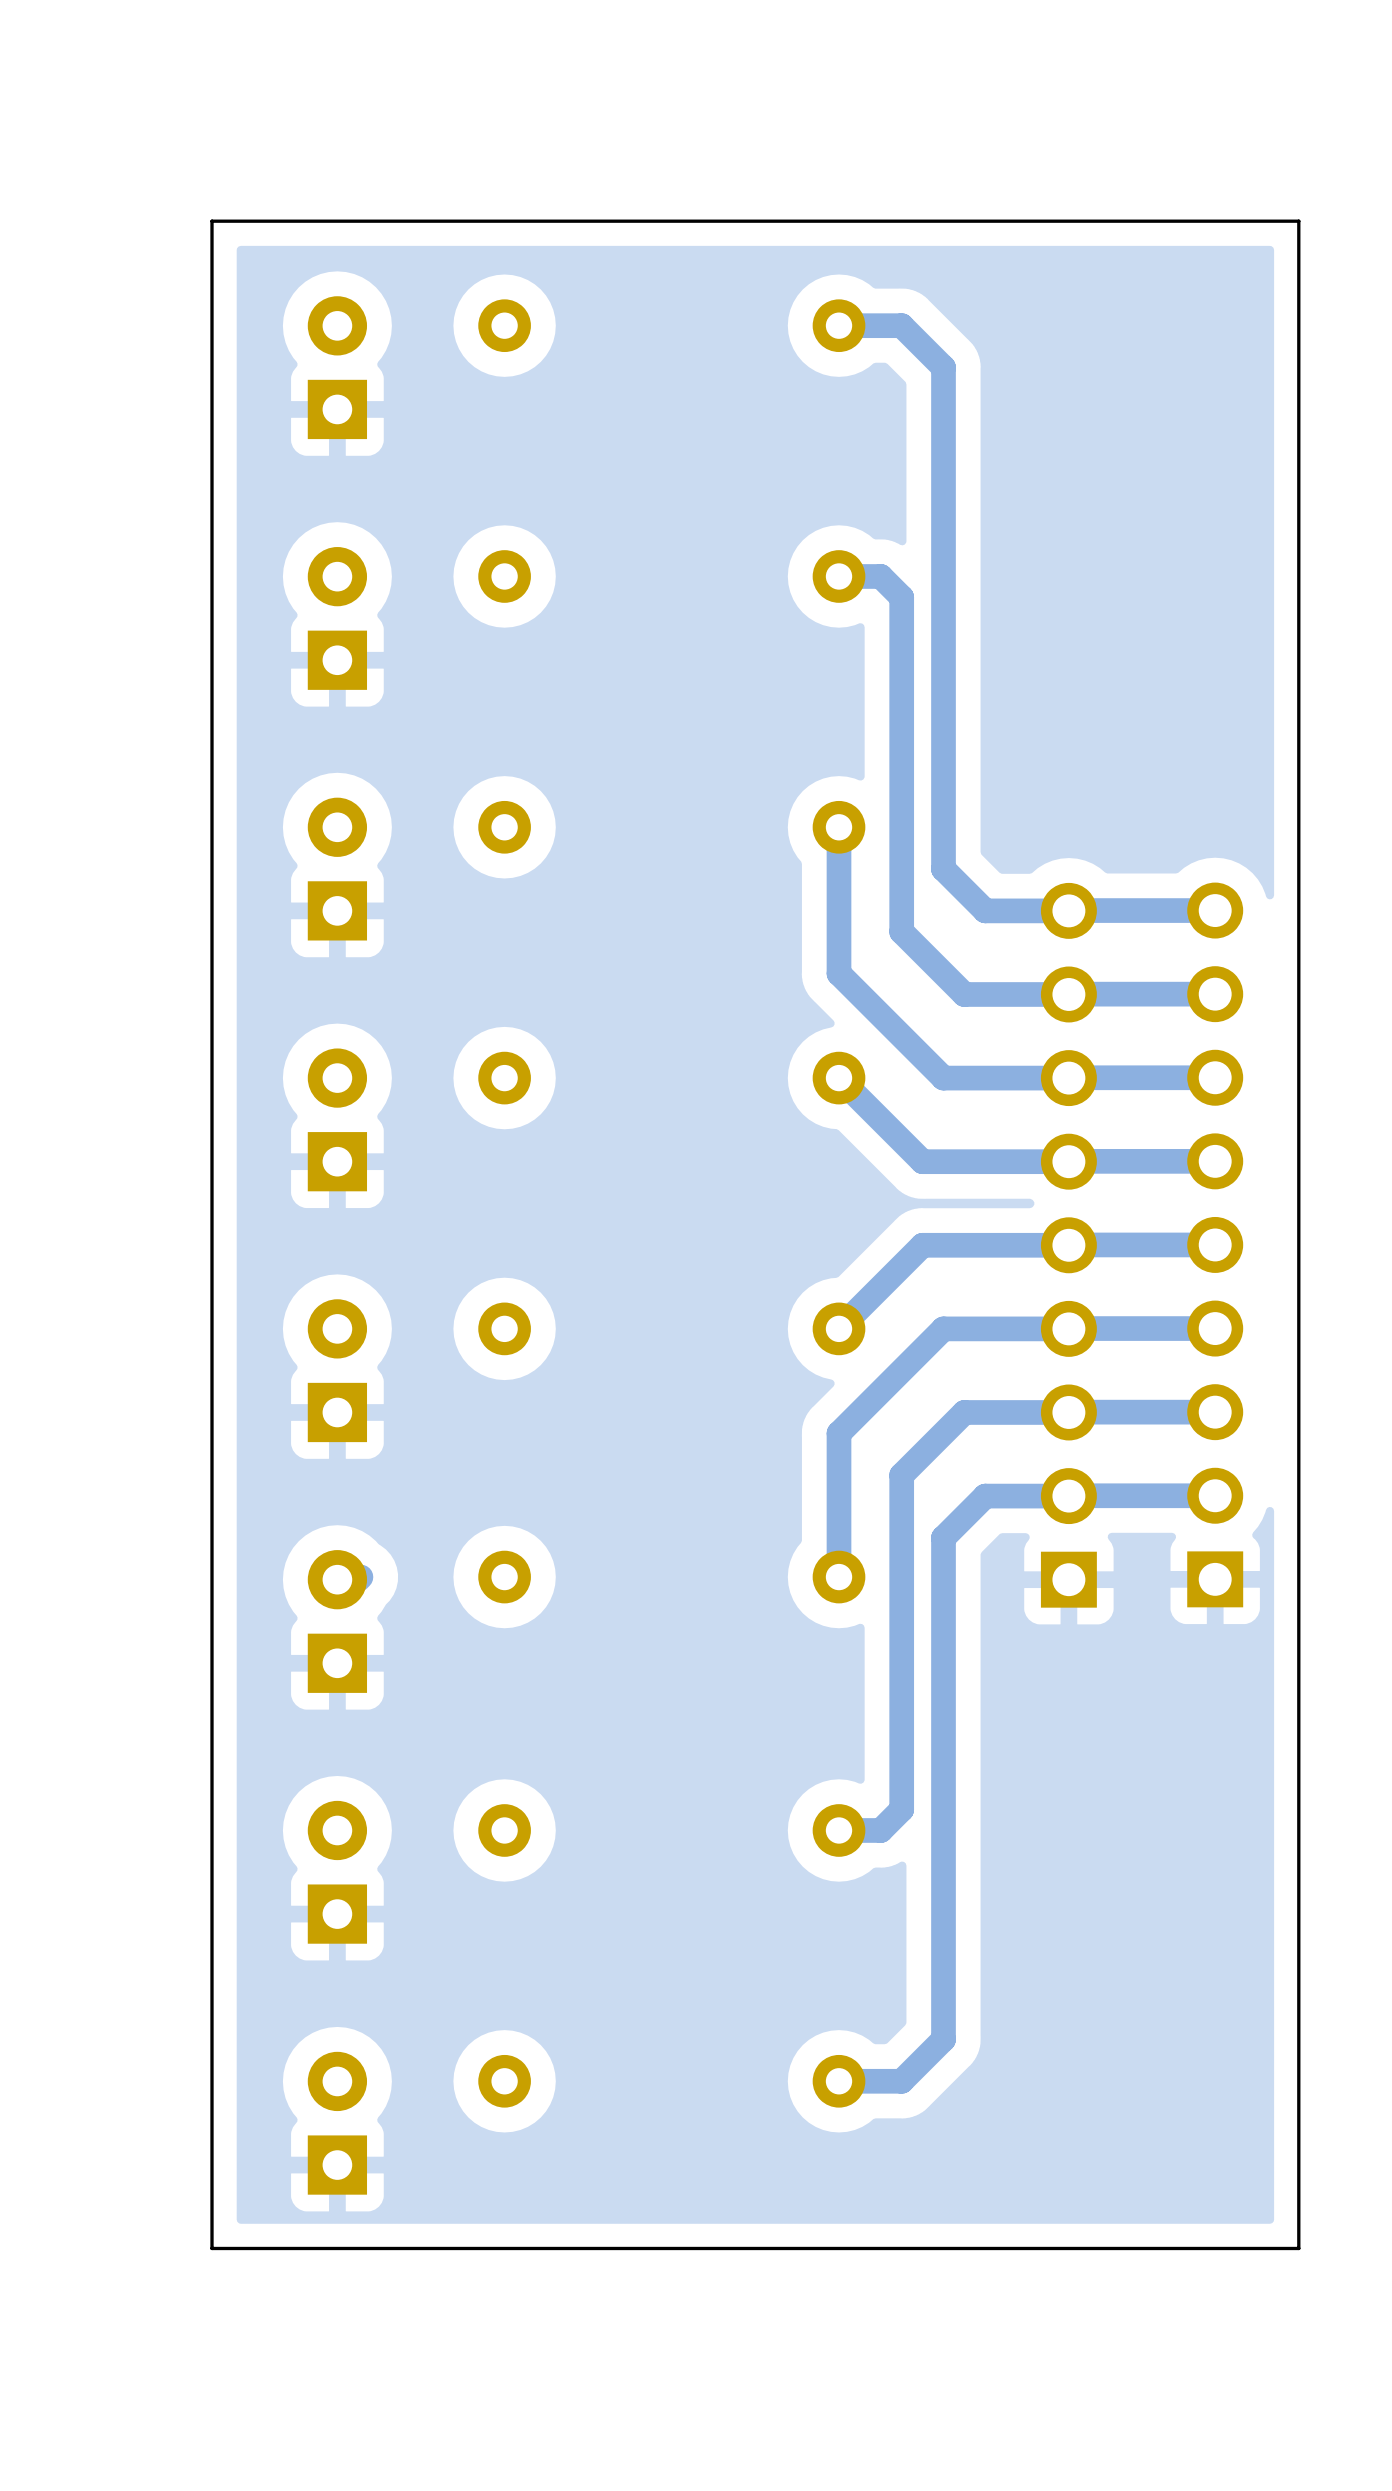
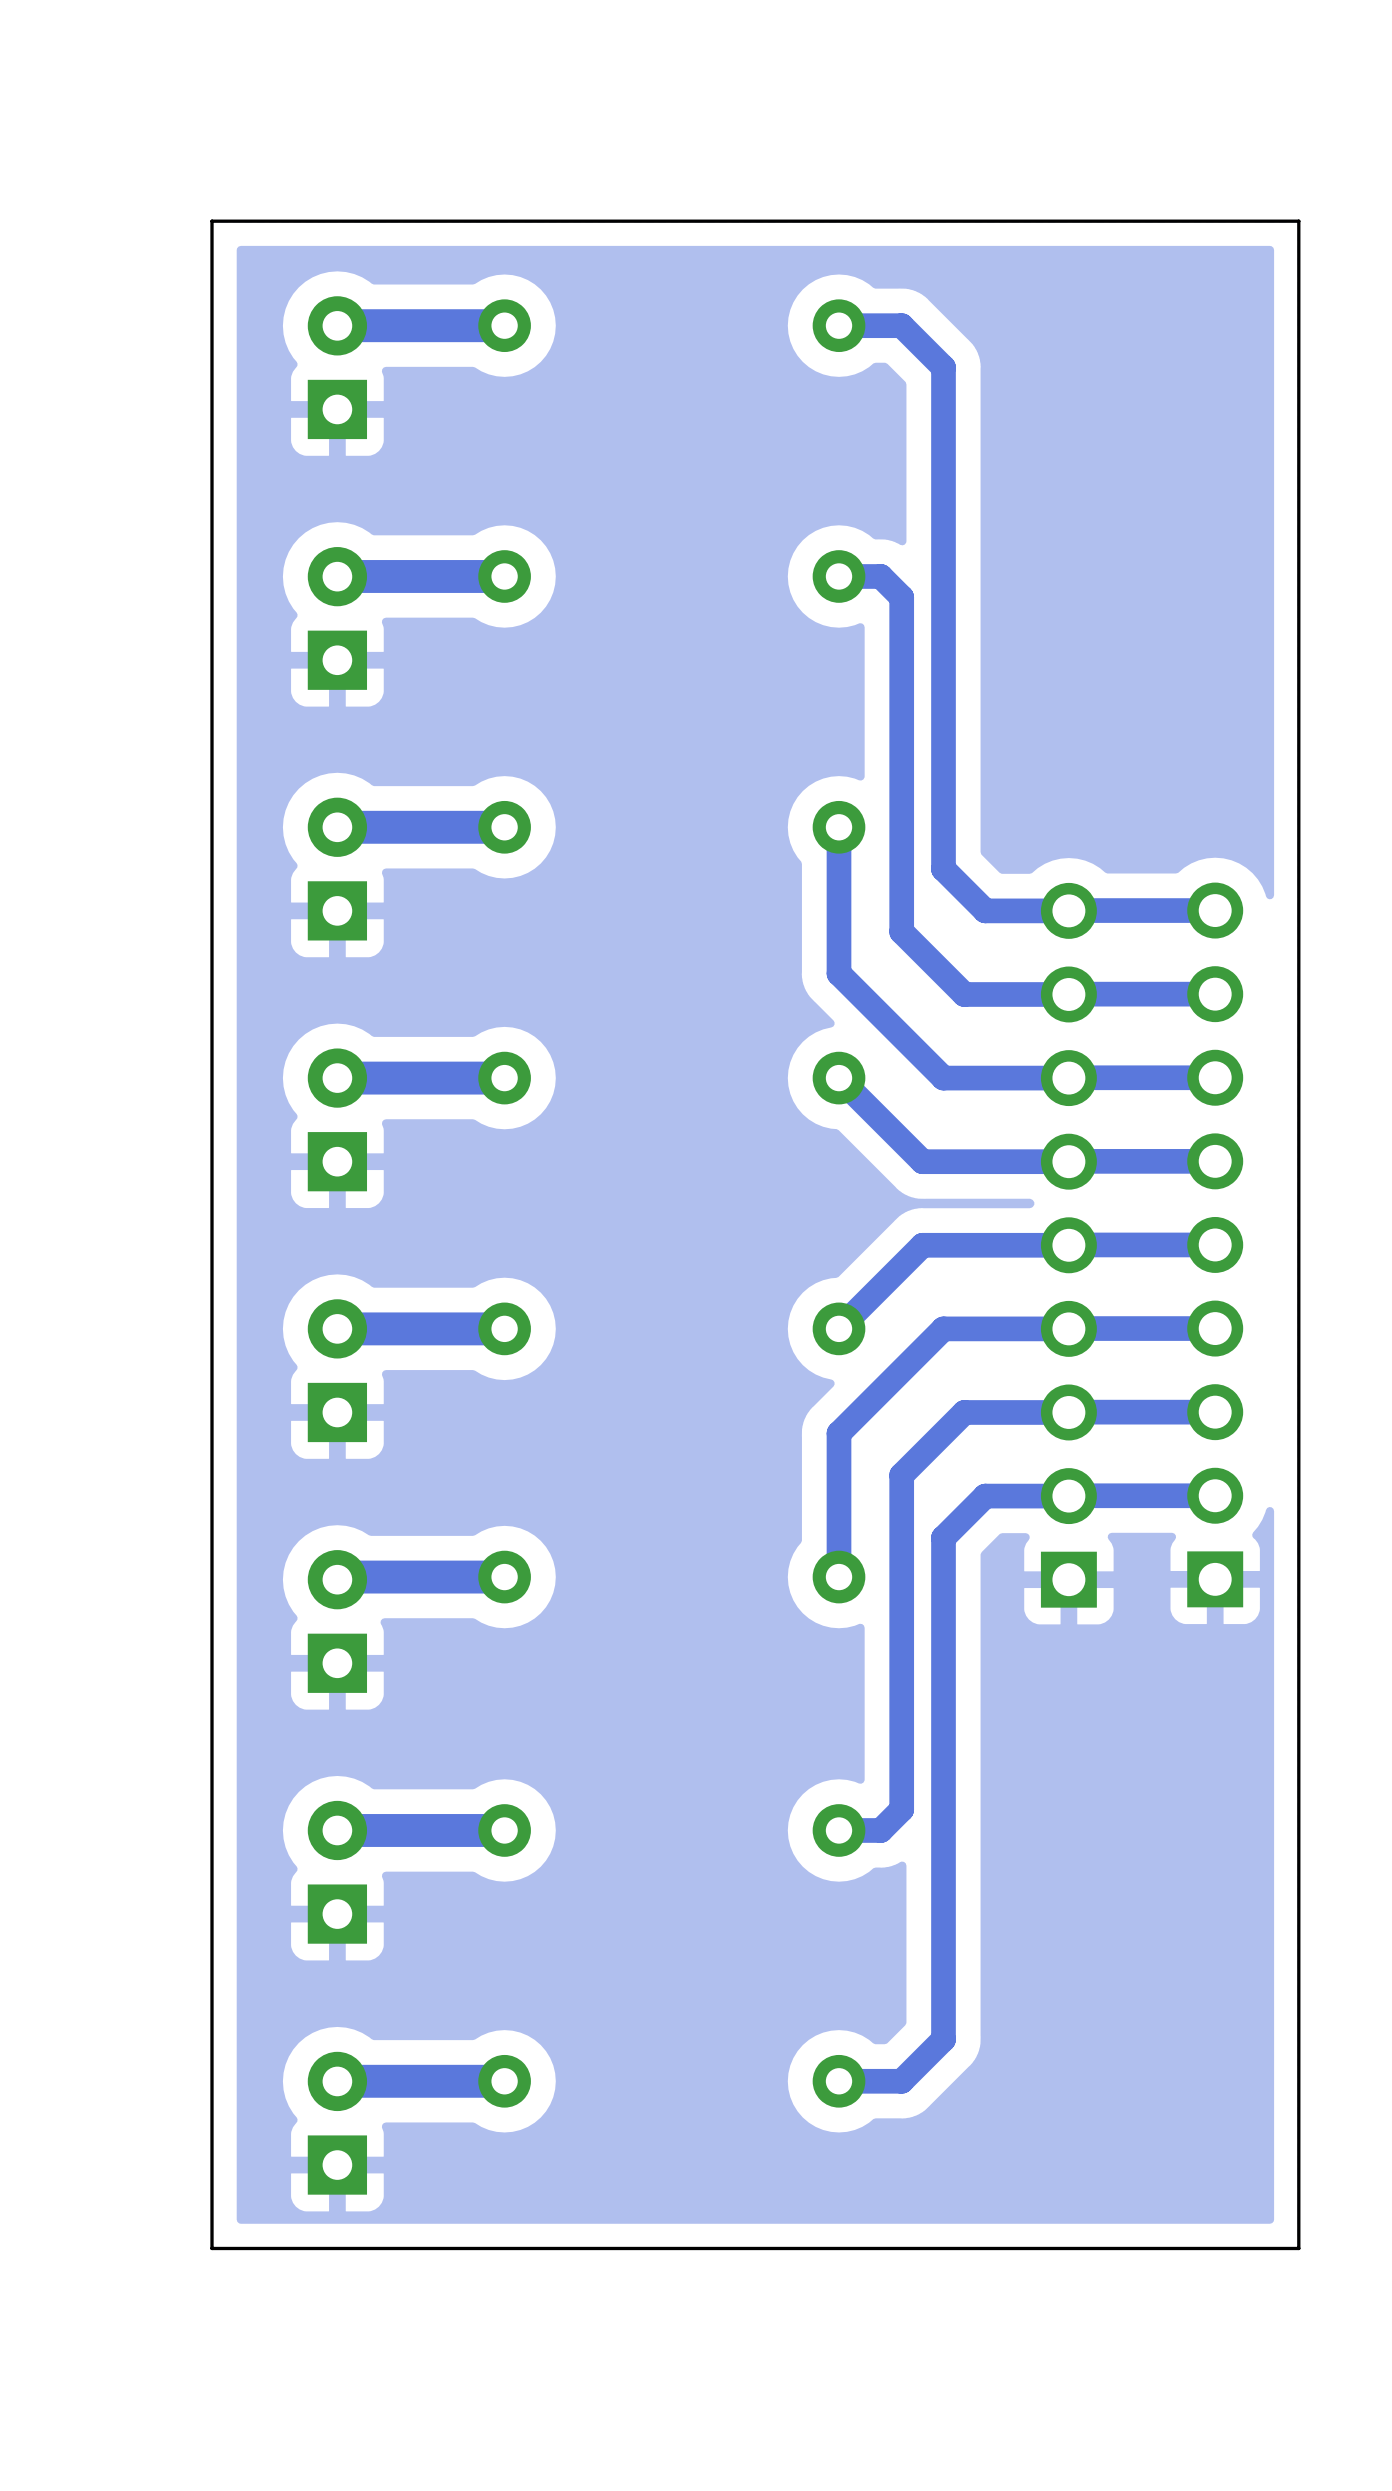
bottom track: none -> (504, 325) (337, 325)
bottom track: none -> (504, 576) (337, 576)
bottom track: none -> (504, 827) (337, 827)
bottom track: none -> (504, 1078) (337, 1078)
bottom track: none -> (504, 1328) (337, 1328)
bottom track: none -> (504, 1577) (340, 1577) (337, 1579)
bottom track: none -> (504, 1830) (337, 1830)
bottom track: none -> (504, 2081) (337, 2081)

